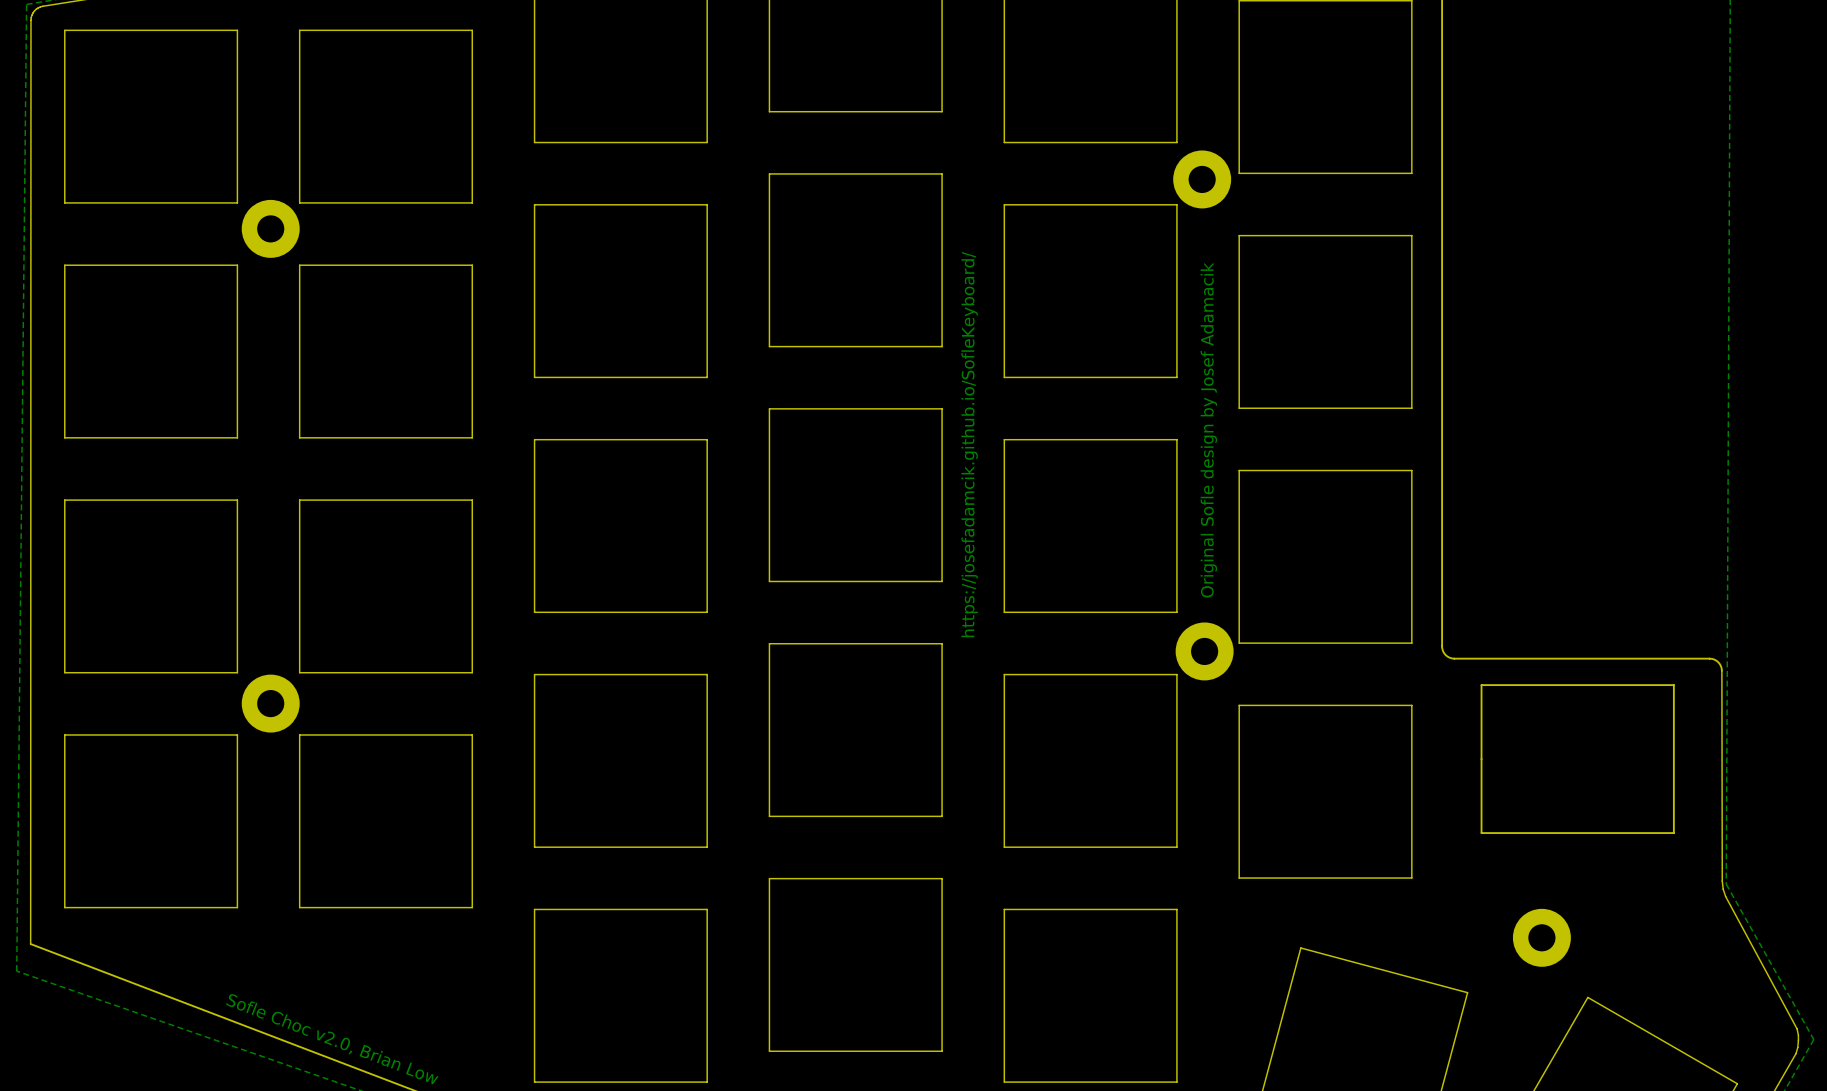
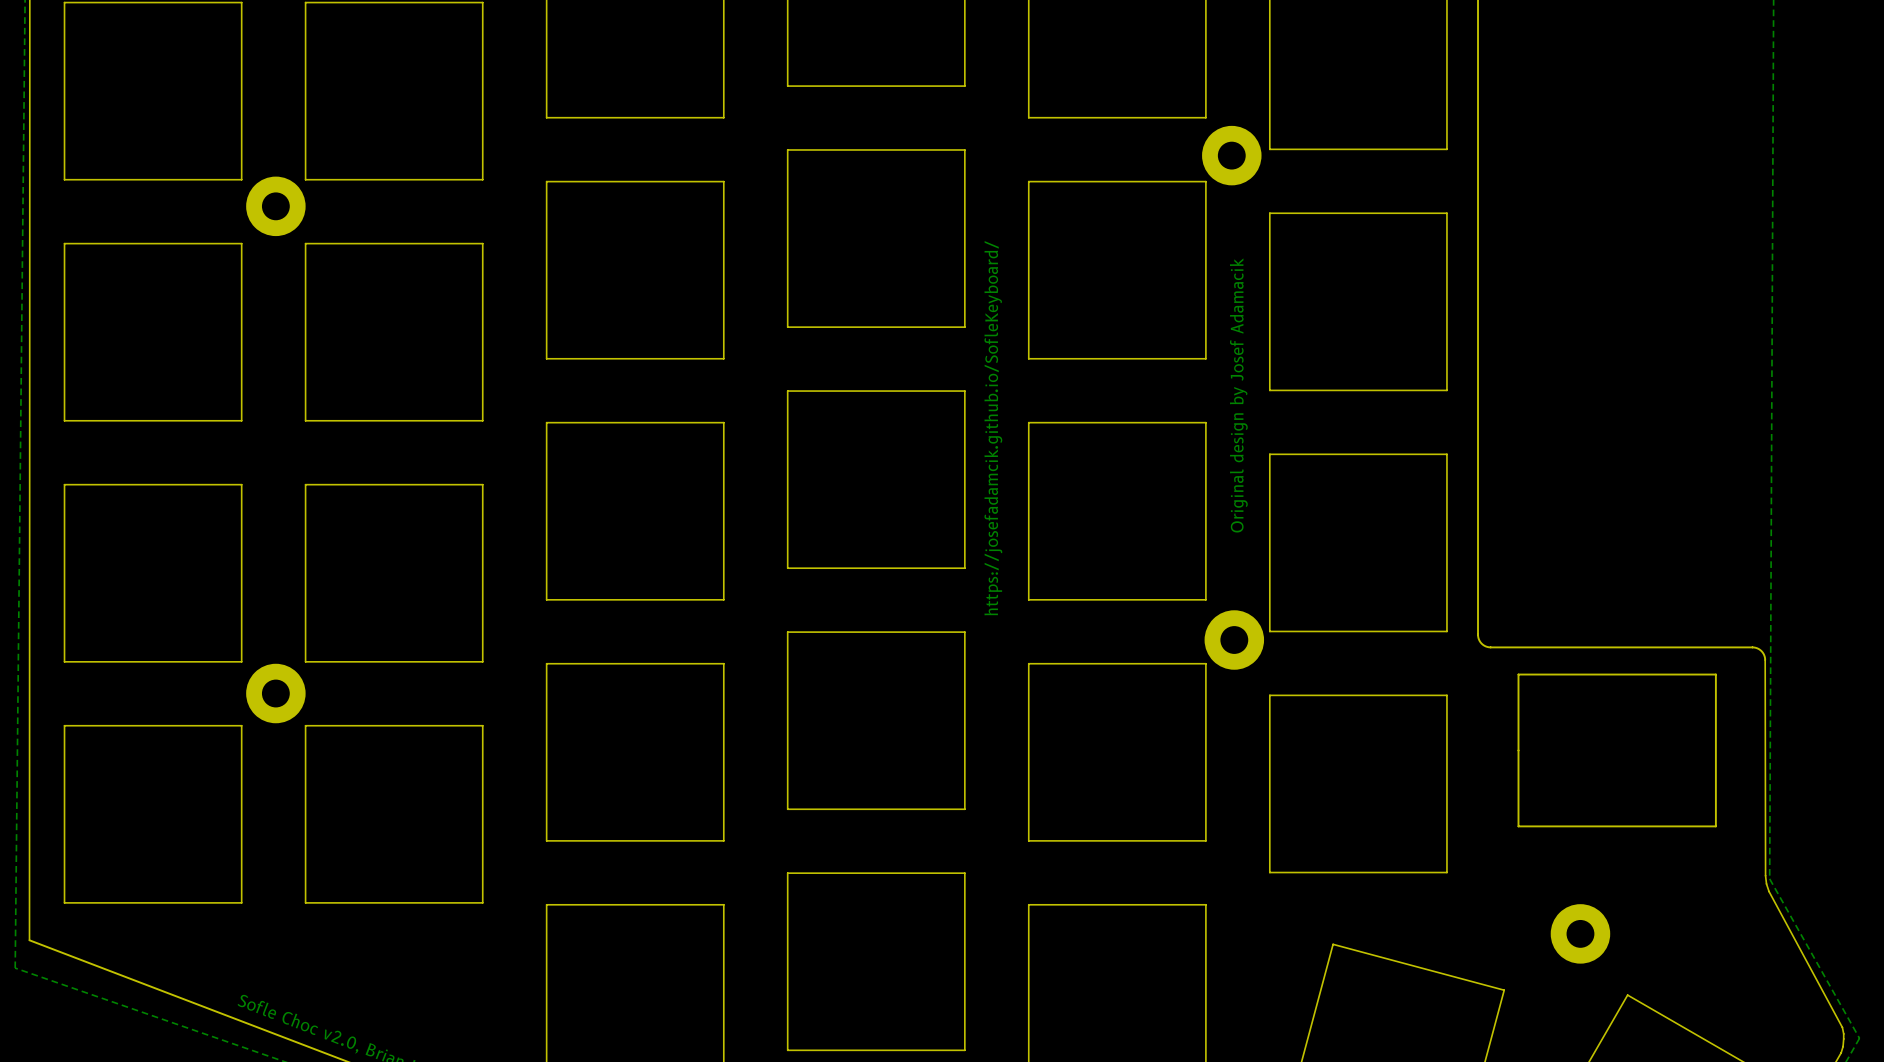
text: Original Sofle design by Josef Adamacik (1208, 430) -> Original design by Josef Adamacik (1238, 395)

